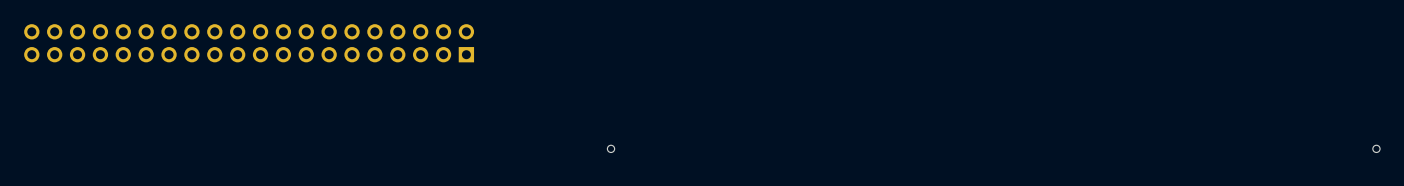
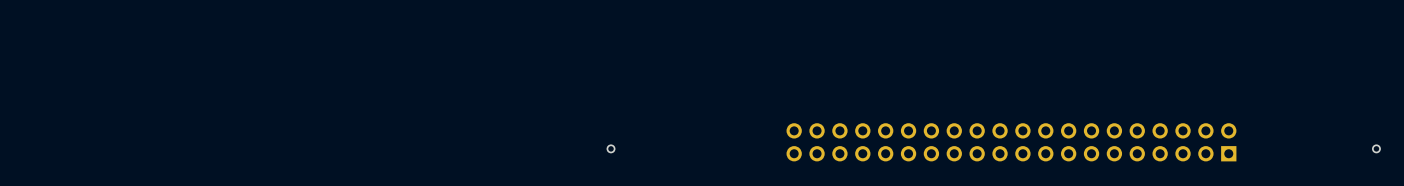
part: (249, 43) -> none
part: none -> (1011, 142)

